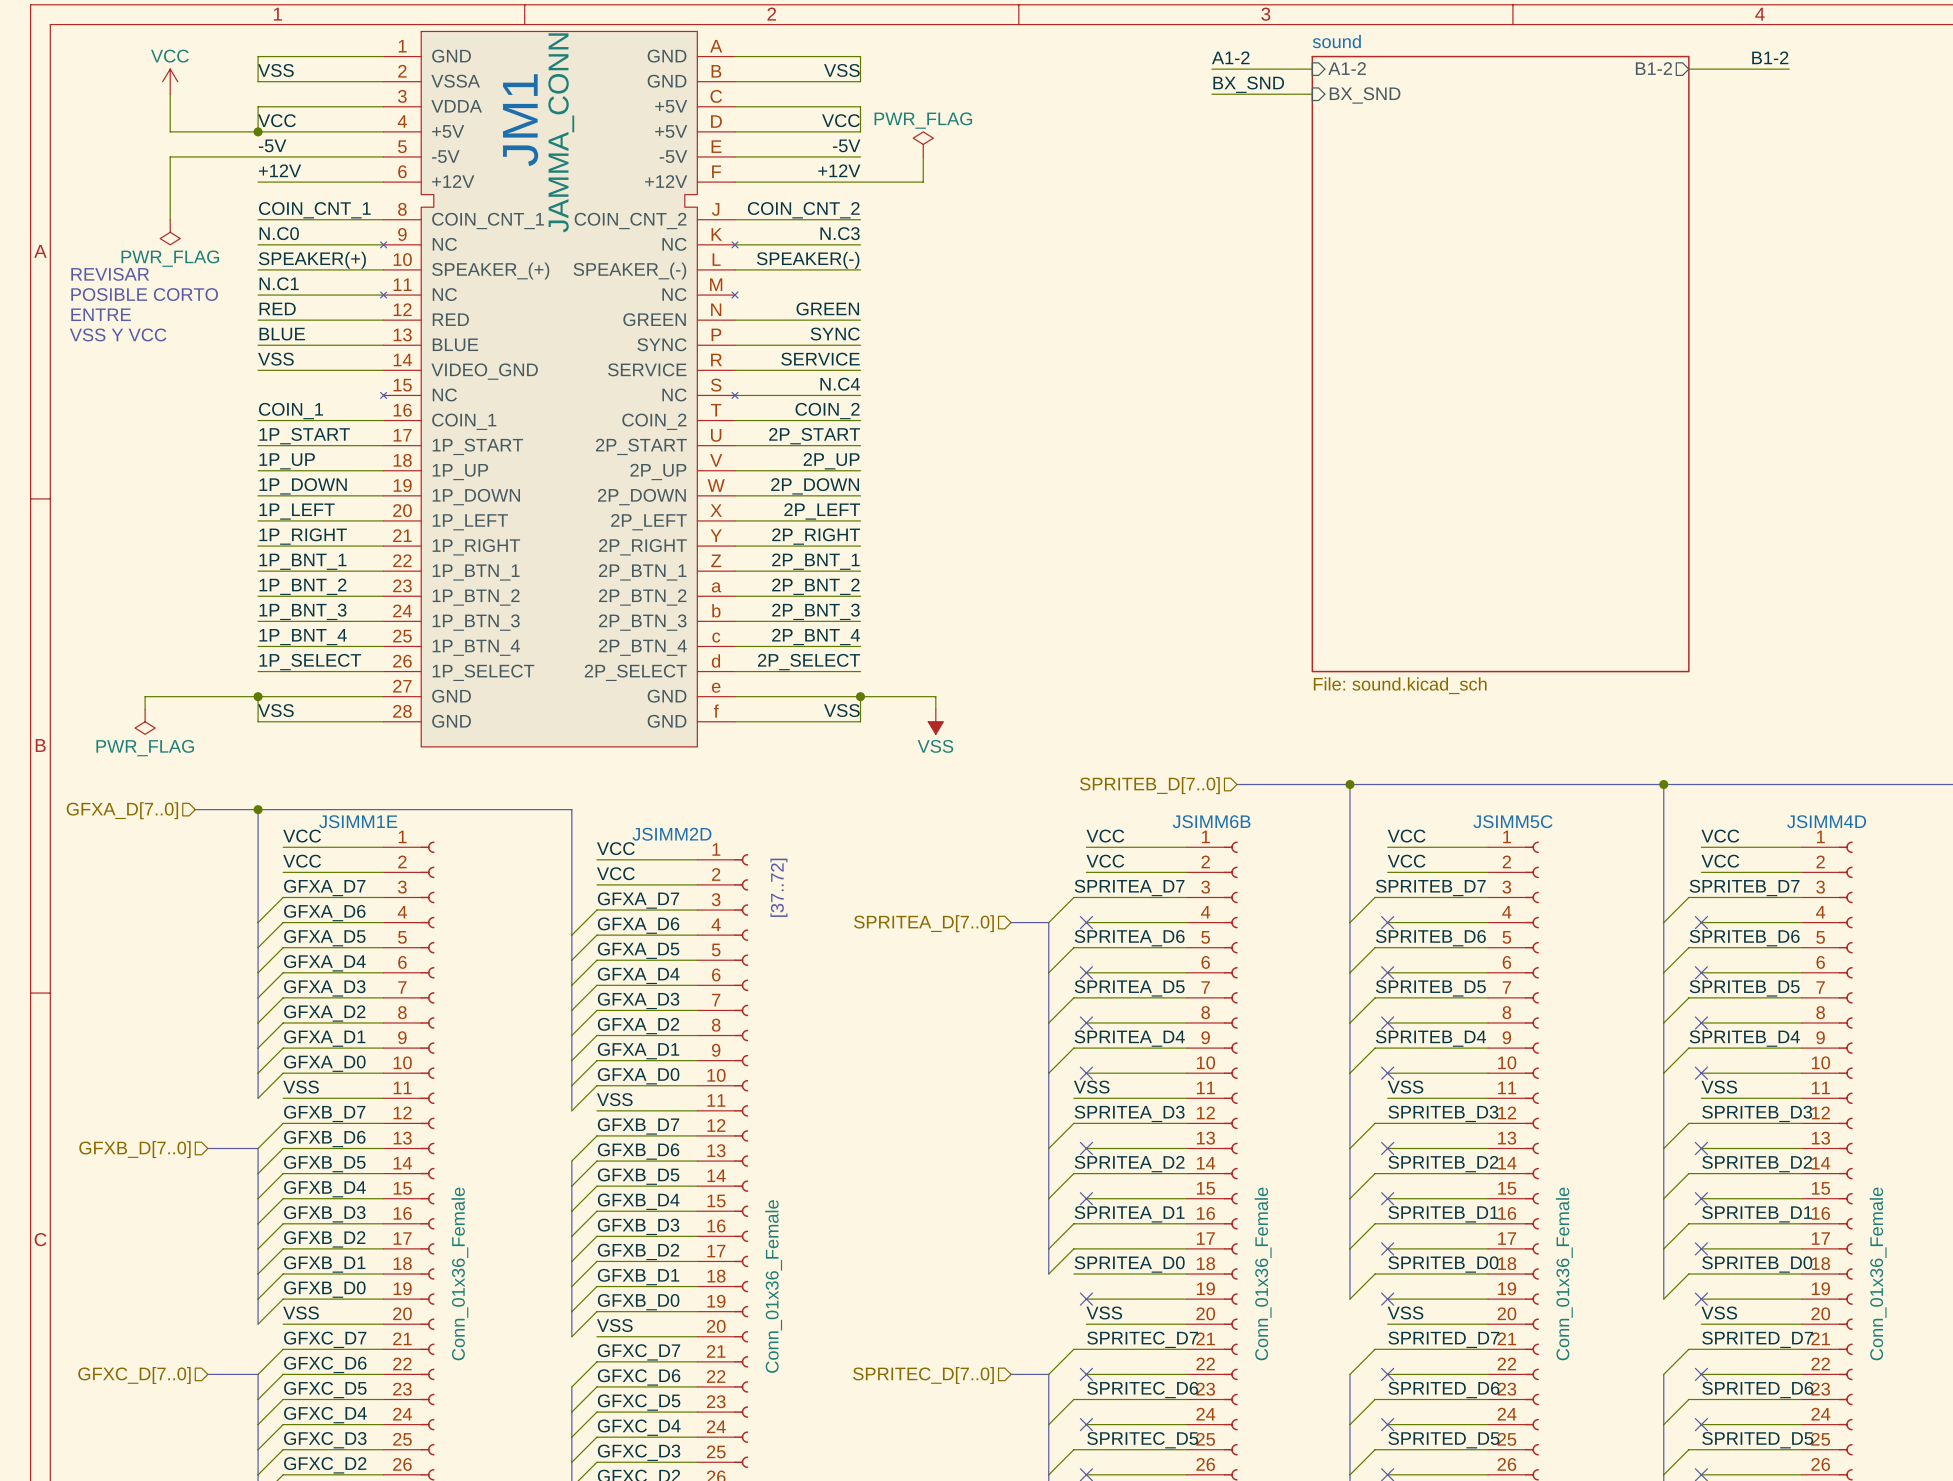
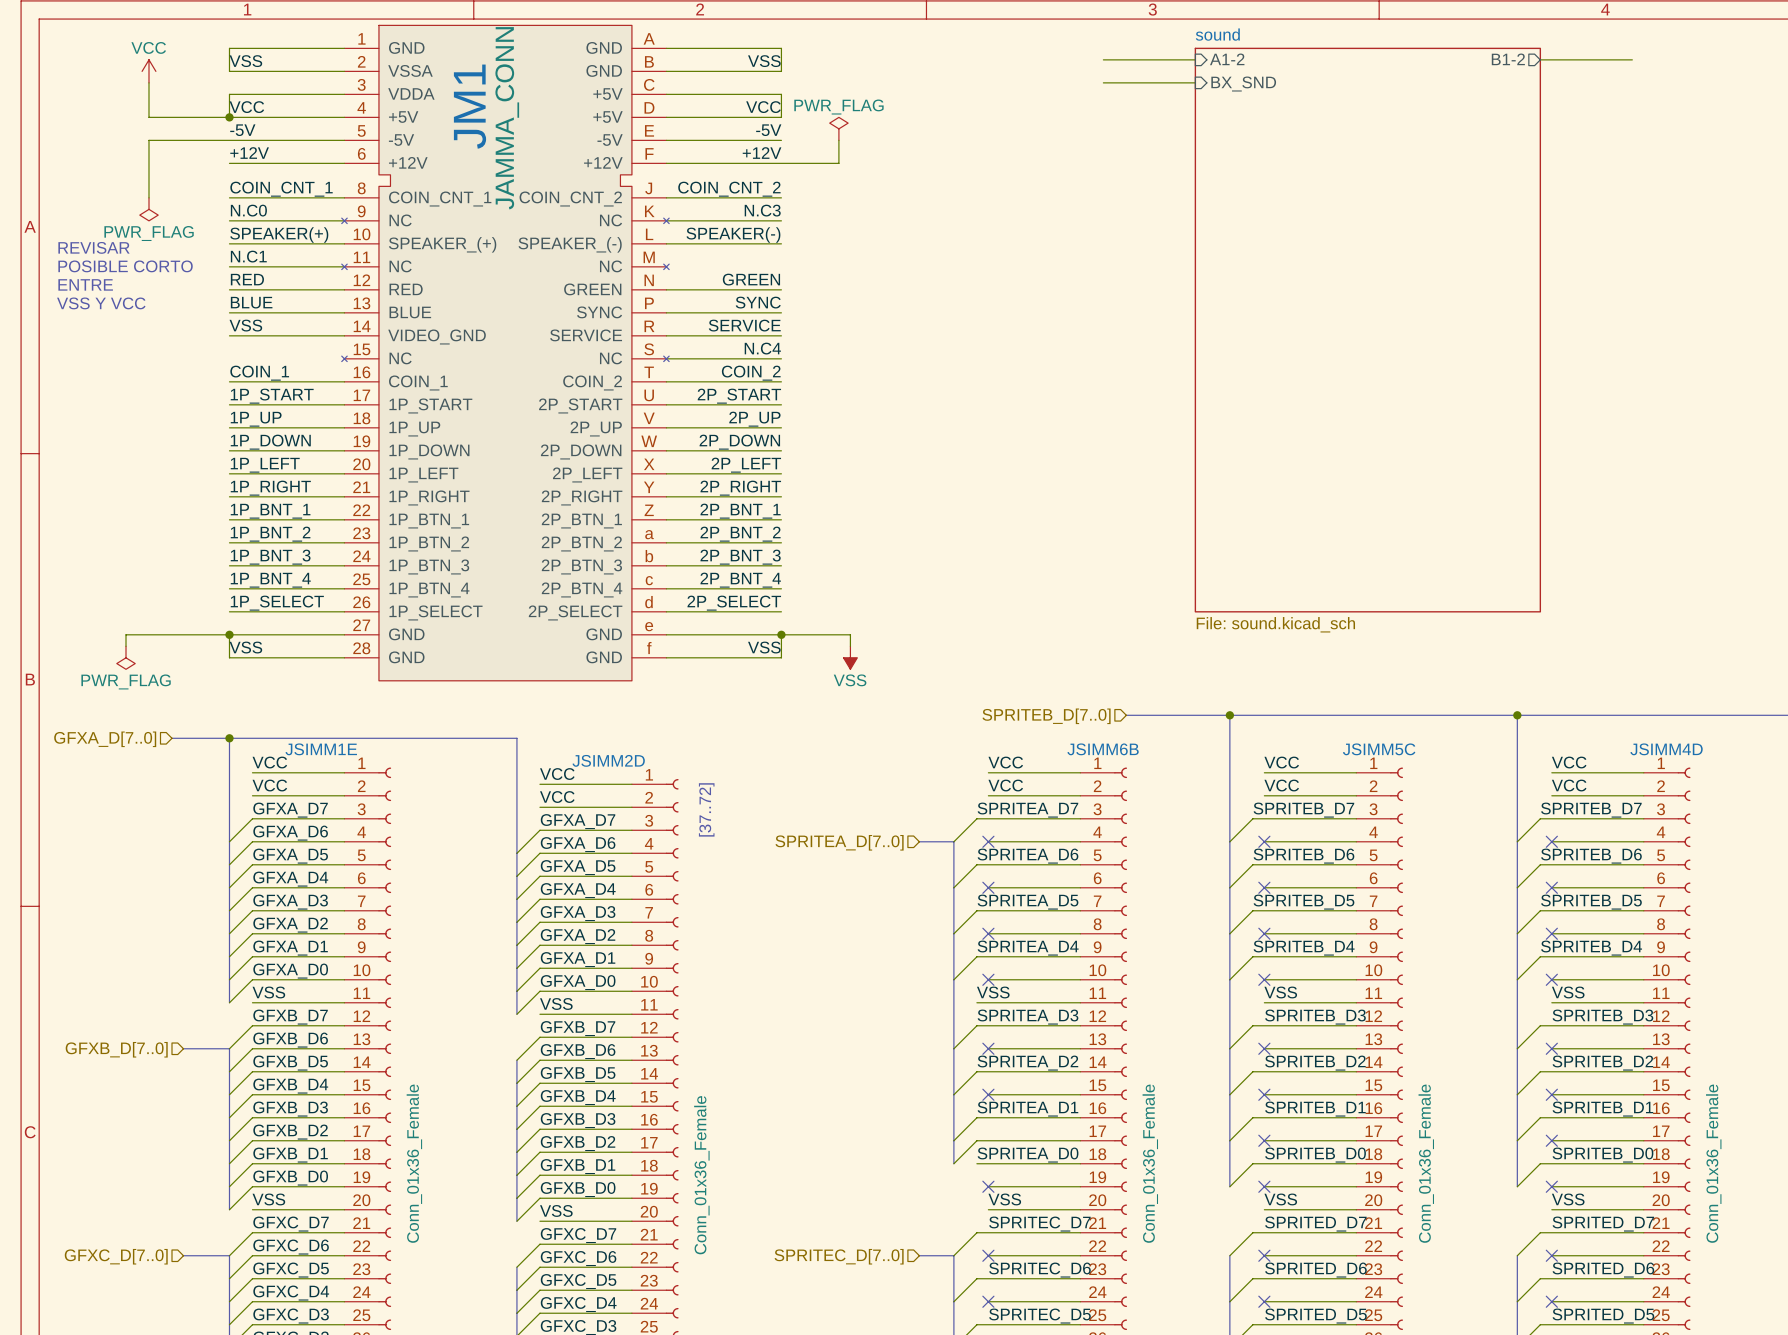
label: A1-2 (1230, 57) -> none
label: B1-2 (1770, 57) -> none
label: BX_SND (1248, 84) -> none

